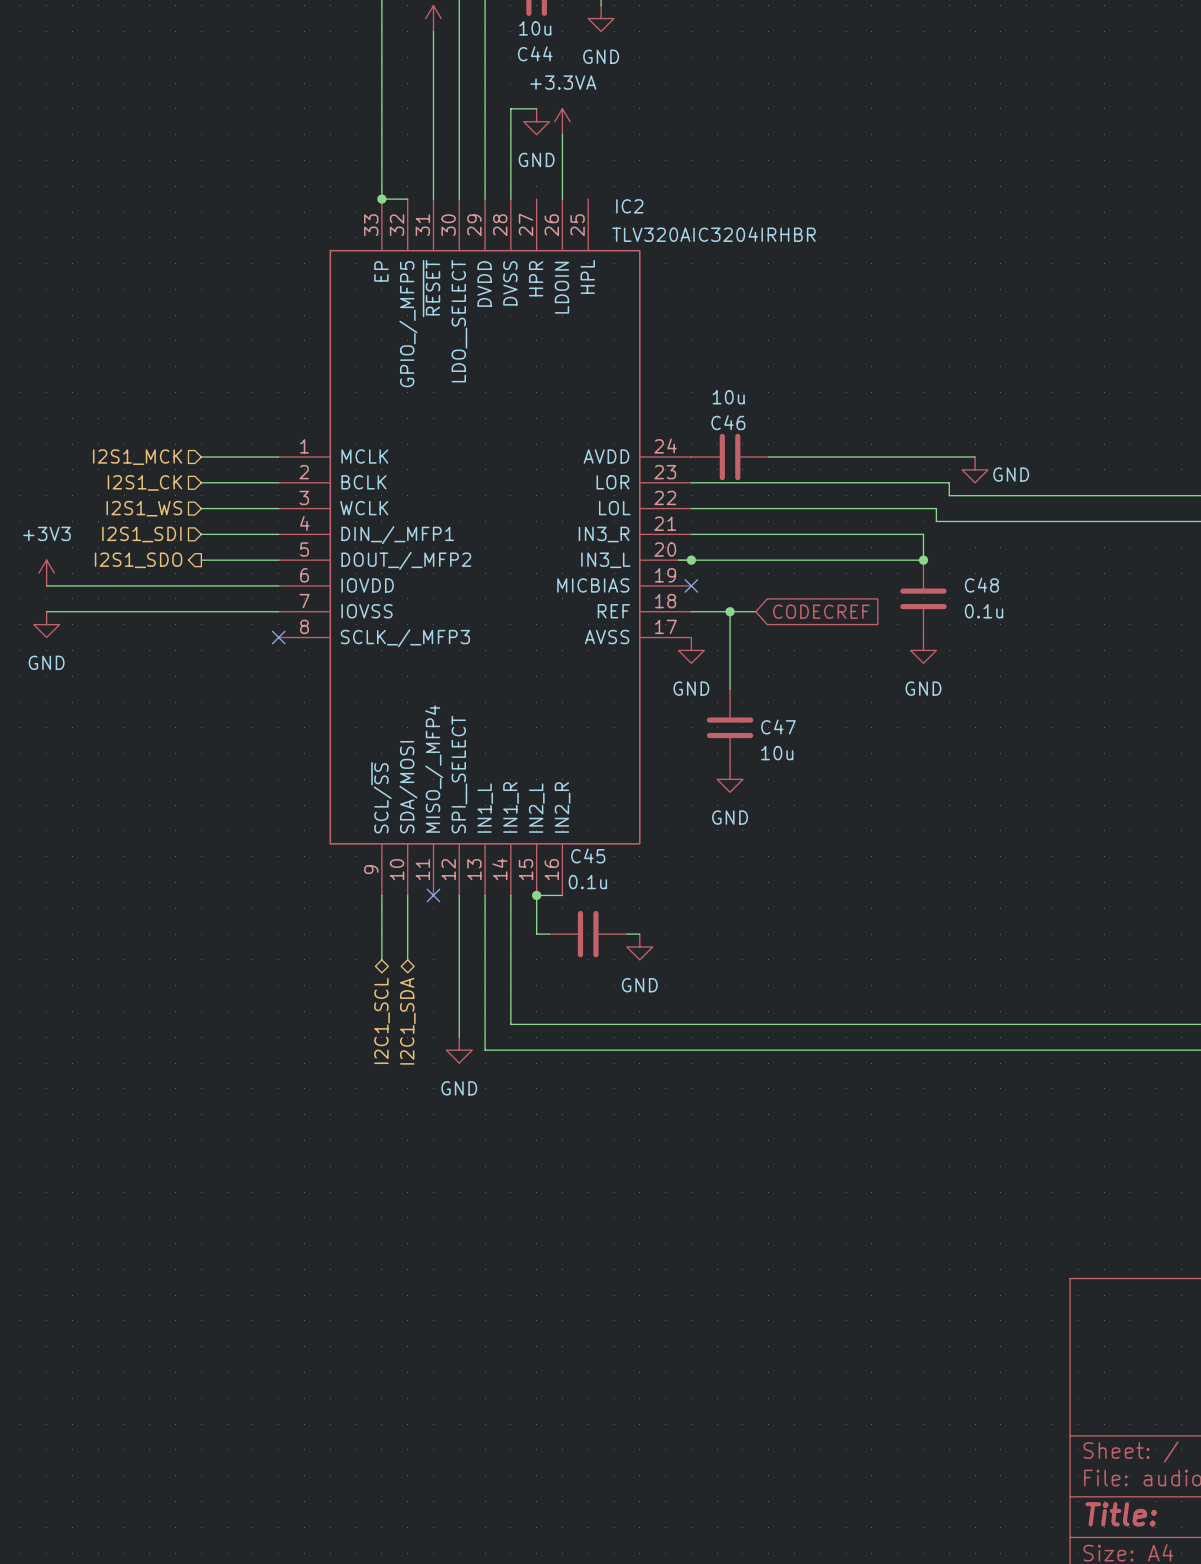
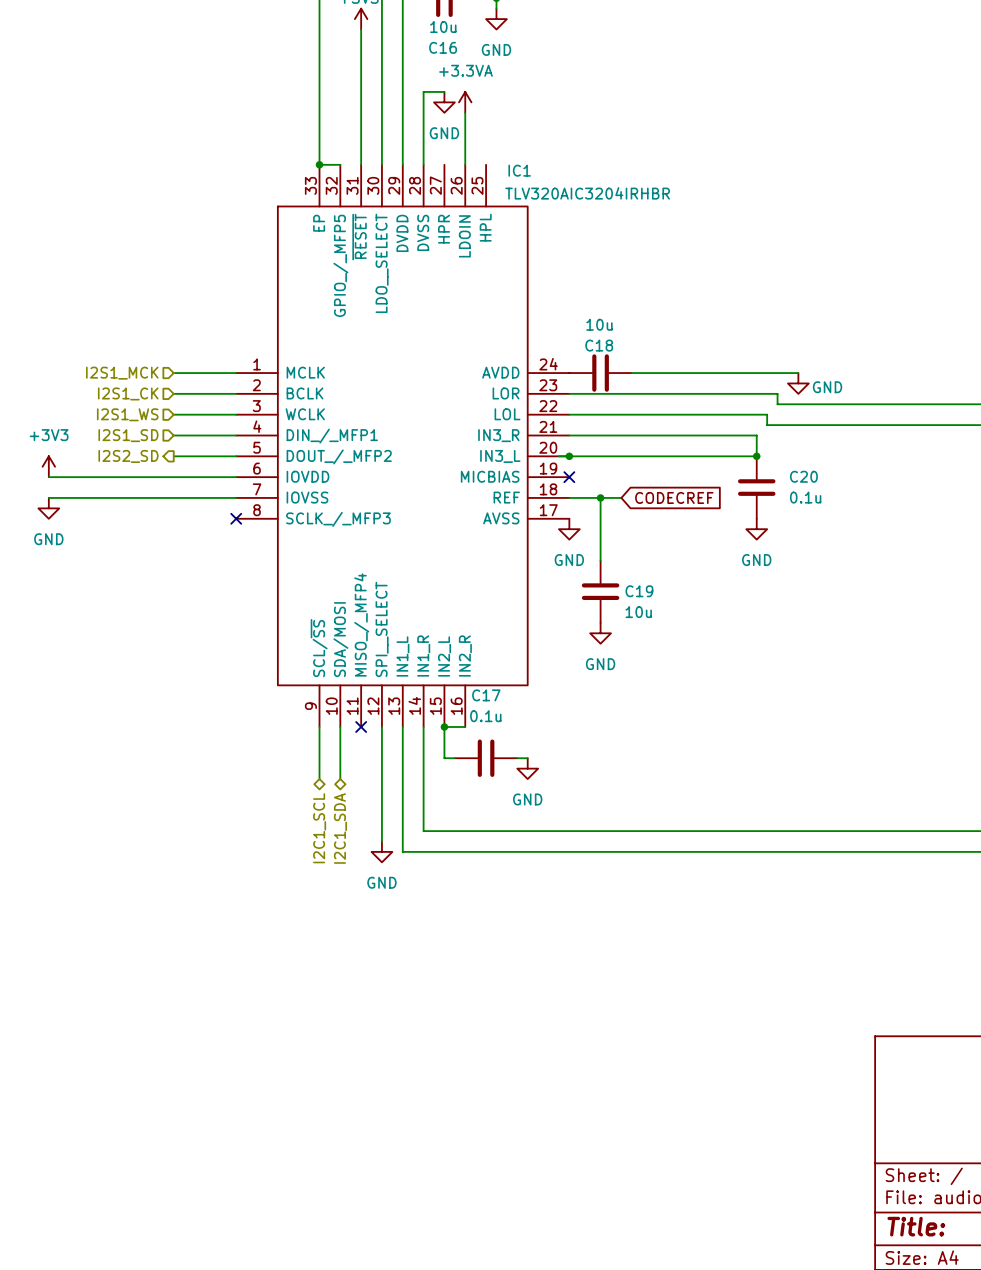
C44 name: C44 (535, 53) -> C16 (443, 47)
IC2 name: IC2 (629, 206) -> IC1 (519, 170)
C46 name: C46 (728, 422) -> C18 (599, 345)
hierarchical label: I2S1_SDI (141, 534) -> I2S1_SD (128, 435)
hierarchical label: I2S1_SDO (138, 560) -> I2S2_SD (128, 456)
C48 name: C48 (981, 585) -> C20 (803, 476)
C47 name: C47 (778, 727) -> C19 (639, 591)
C45 name: C45 (588, 855) -> C17 (486, 695)

